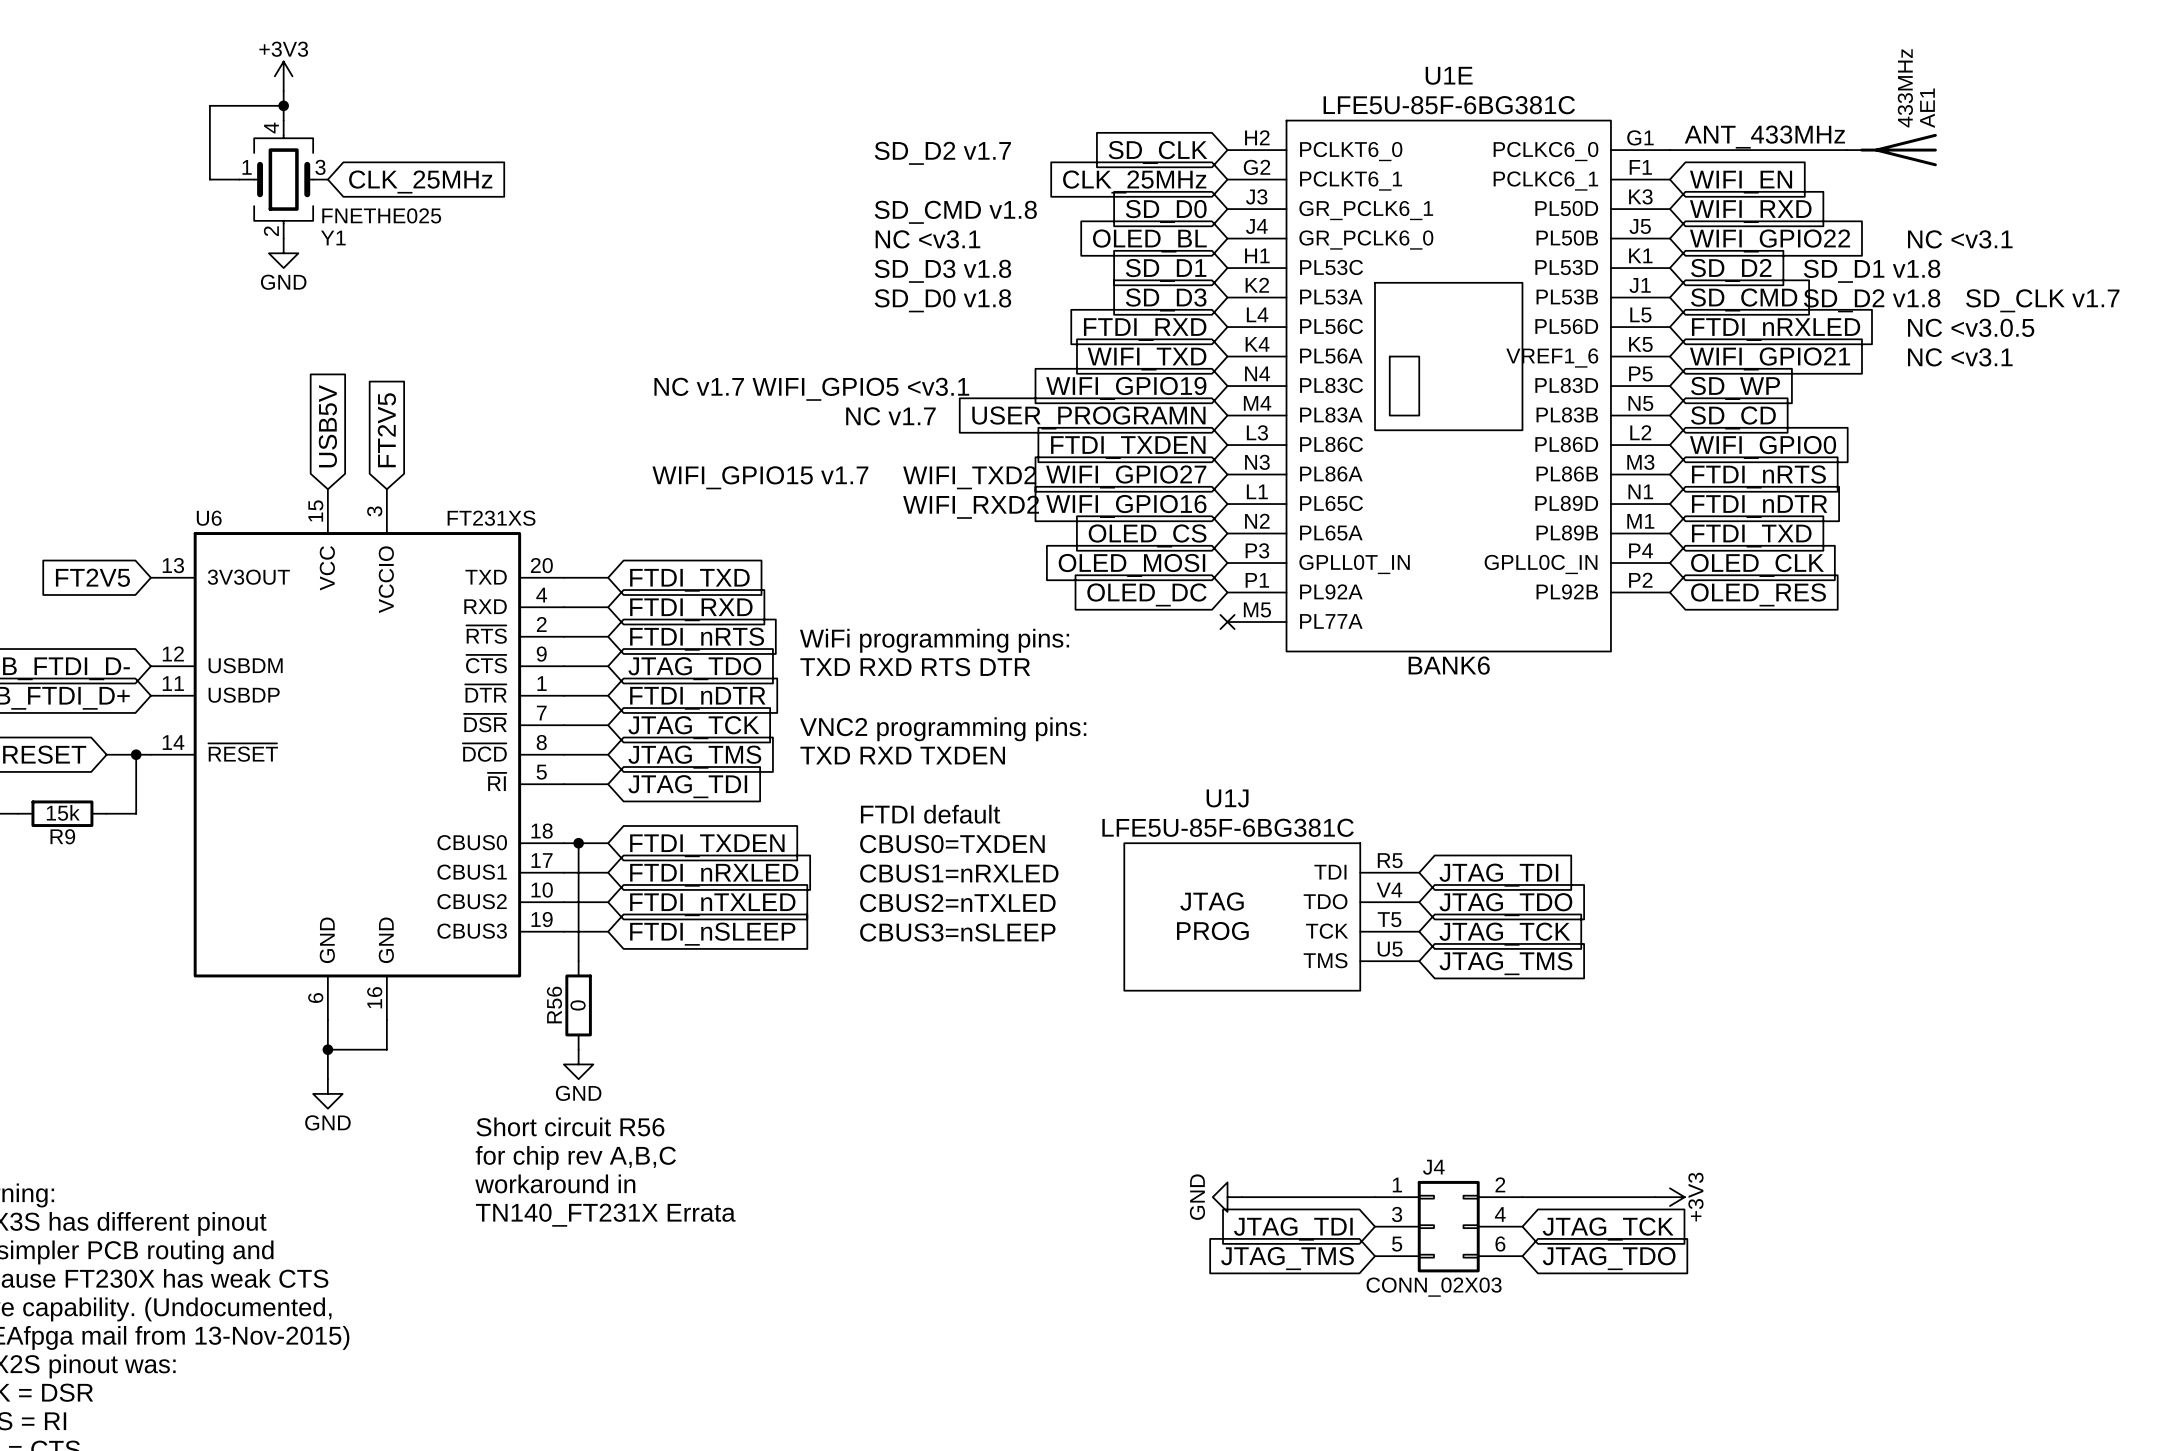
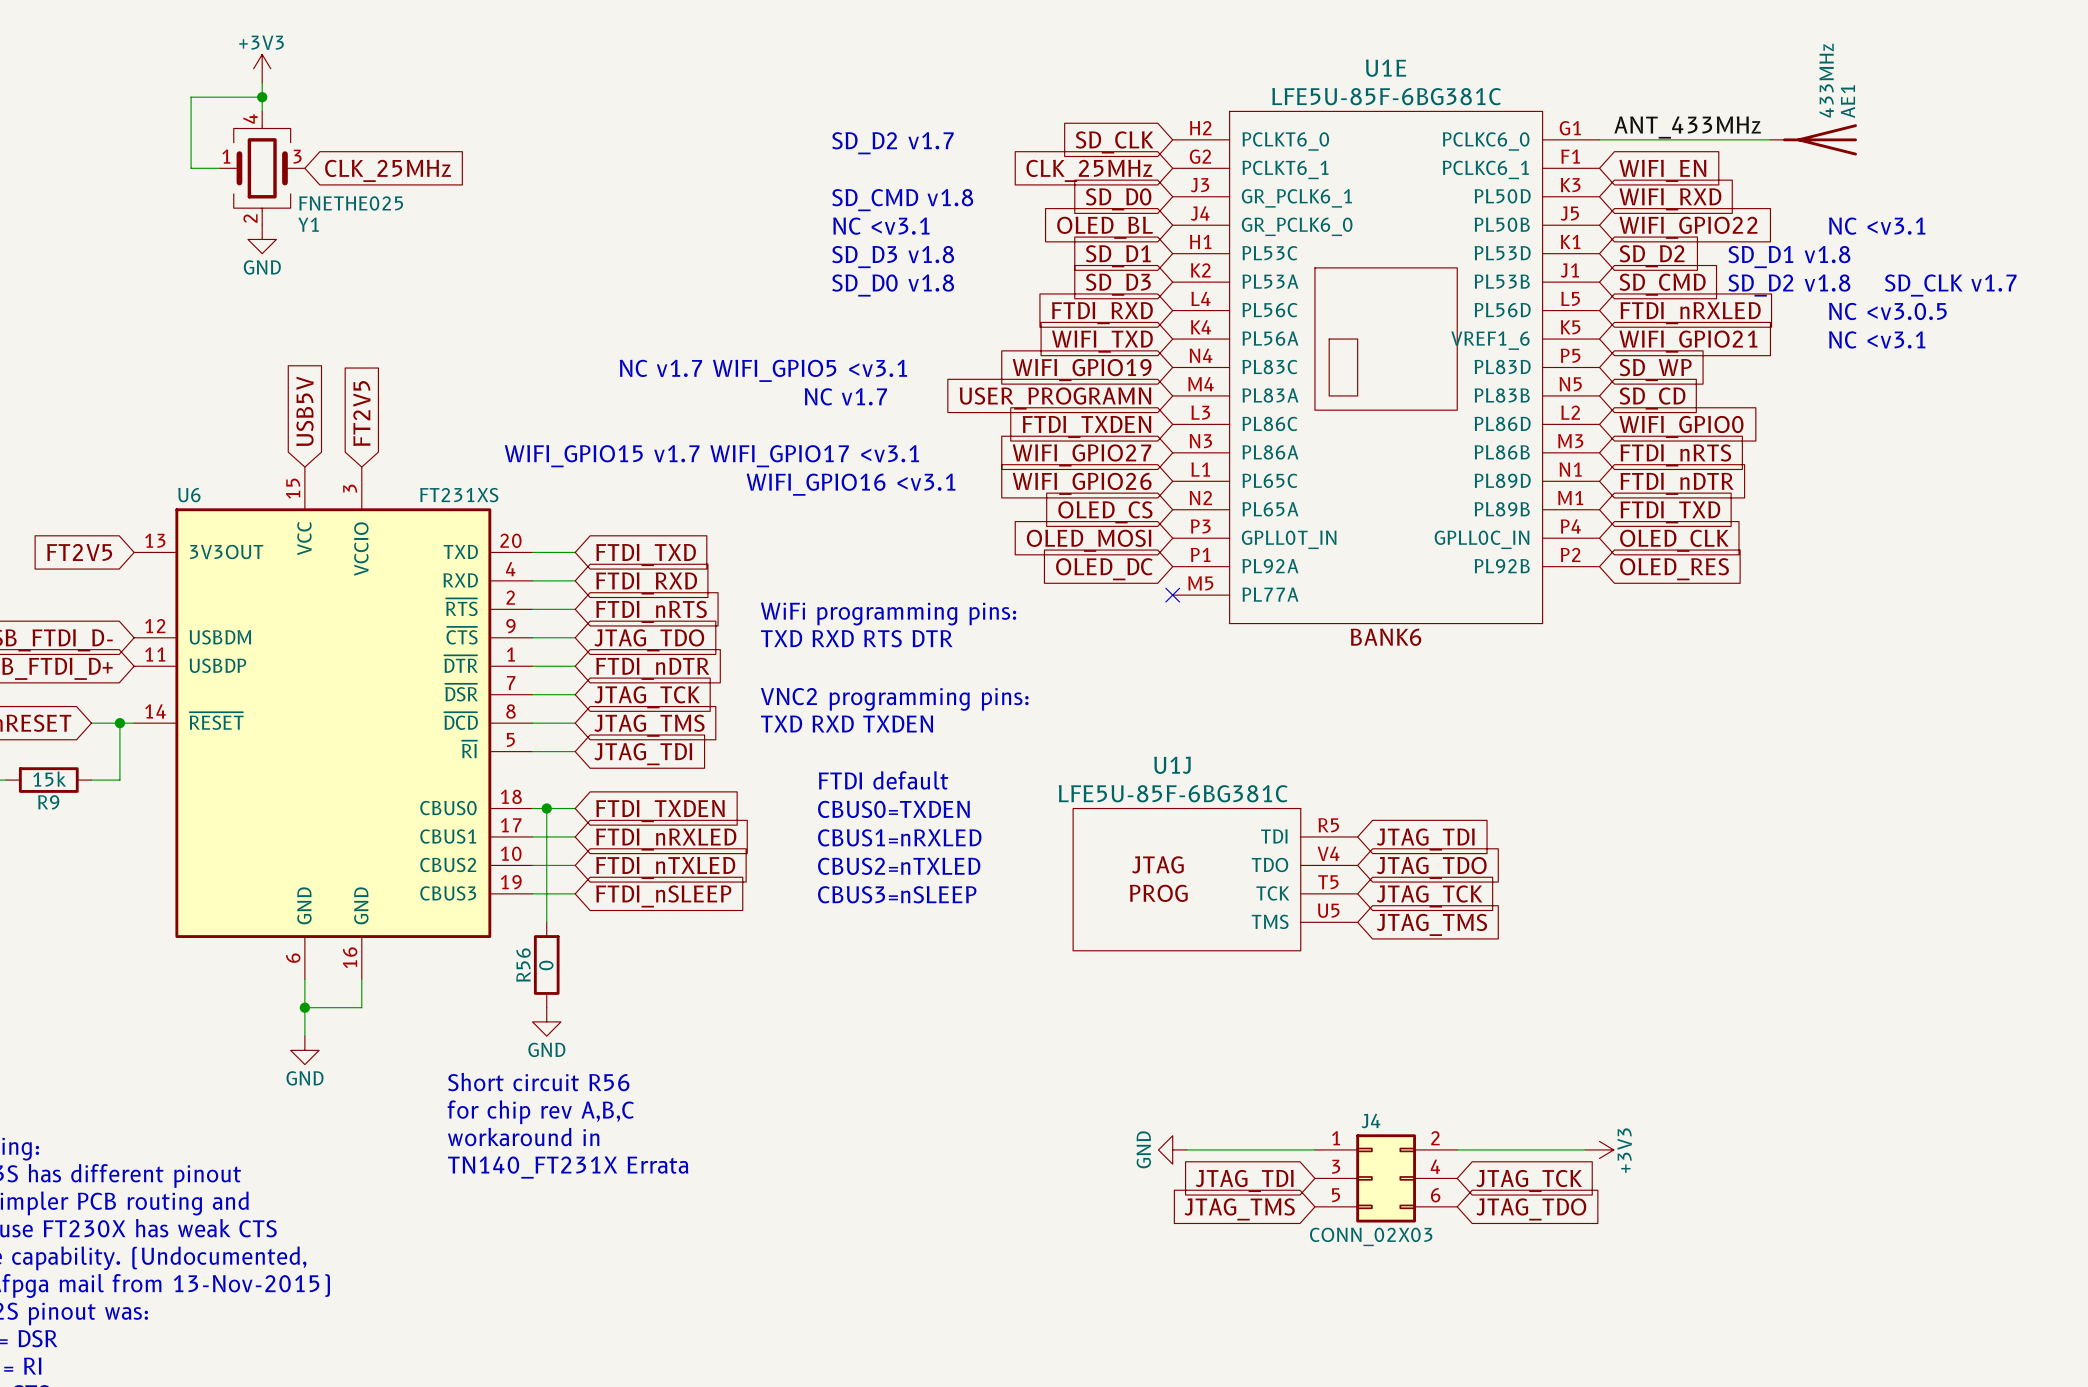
text: WIFI_GPIO15 v1.7 (760, 477) -> none
text: none -> WIFI_GPIO15 v1.7 WIFI_GPIO17 <v3.1 (711, 456)
text: WIFI_TXD2 (969, 477) -> none
global label: WIFI_GPIO16 (1126, 506) -> WIFI_GPIO26 (1082, 483)
text: none -> WIFI_GPIO16 <v3.1 (851, 484)
text: WIFI_RXD2 (971, 507) -> none

